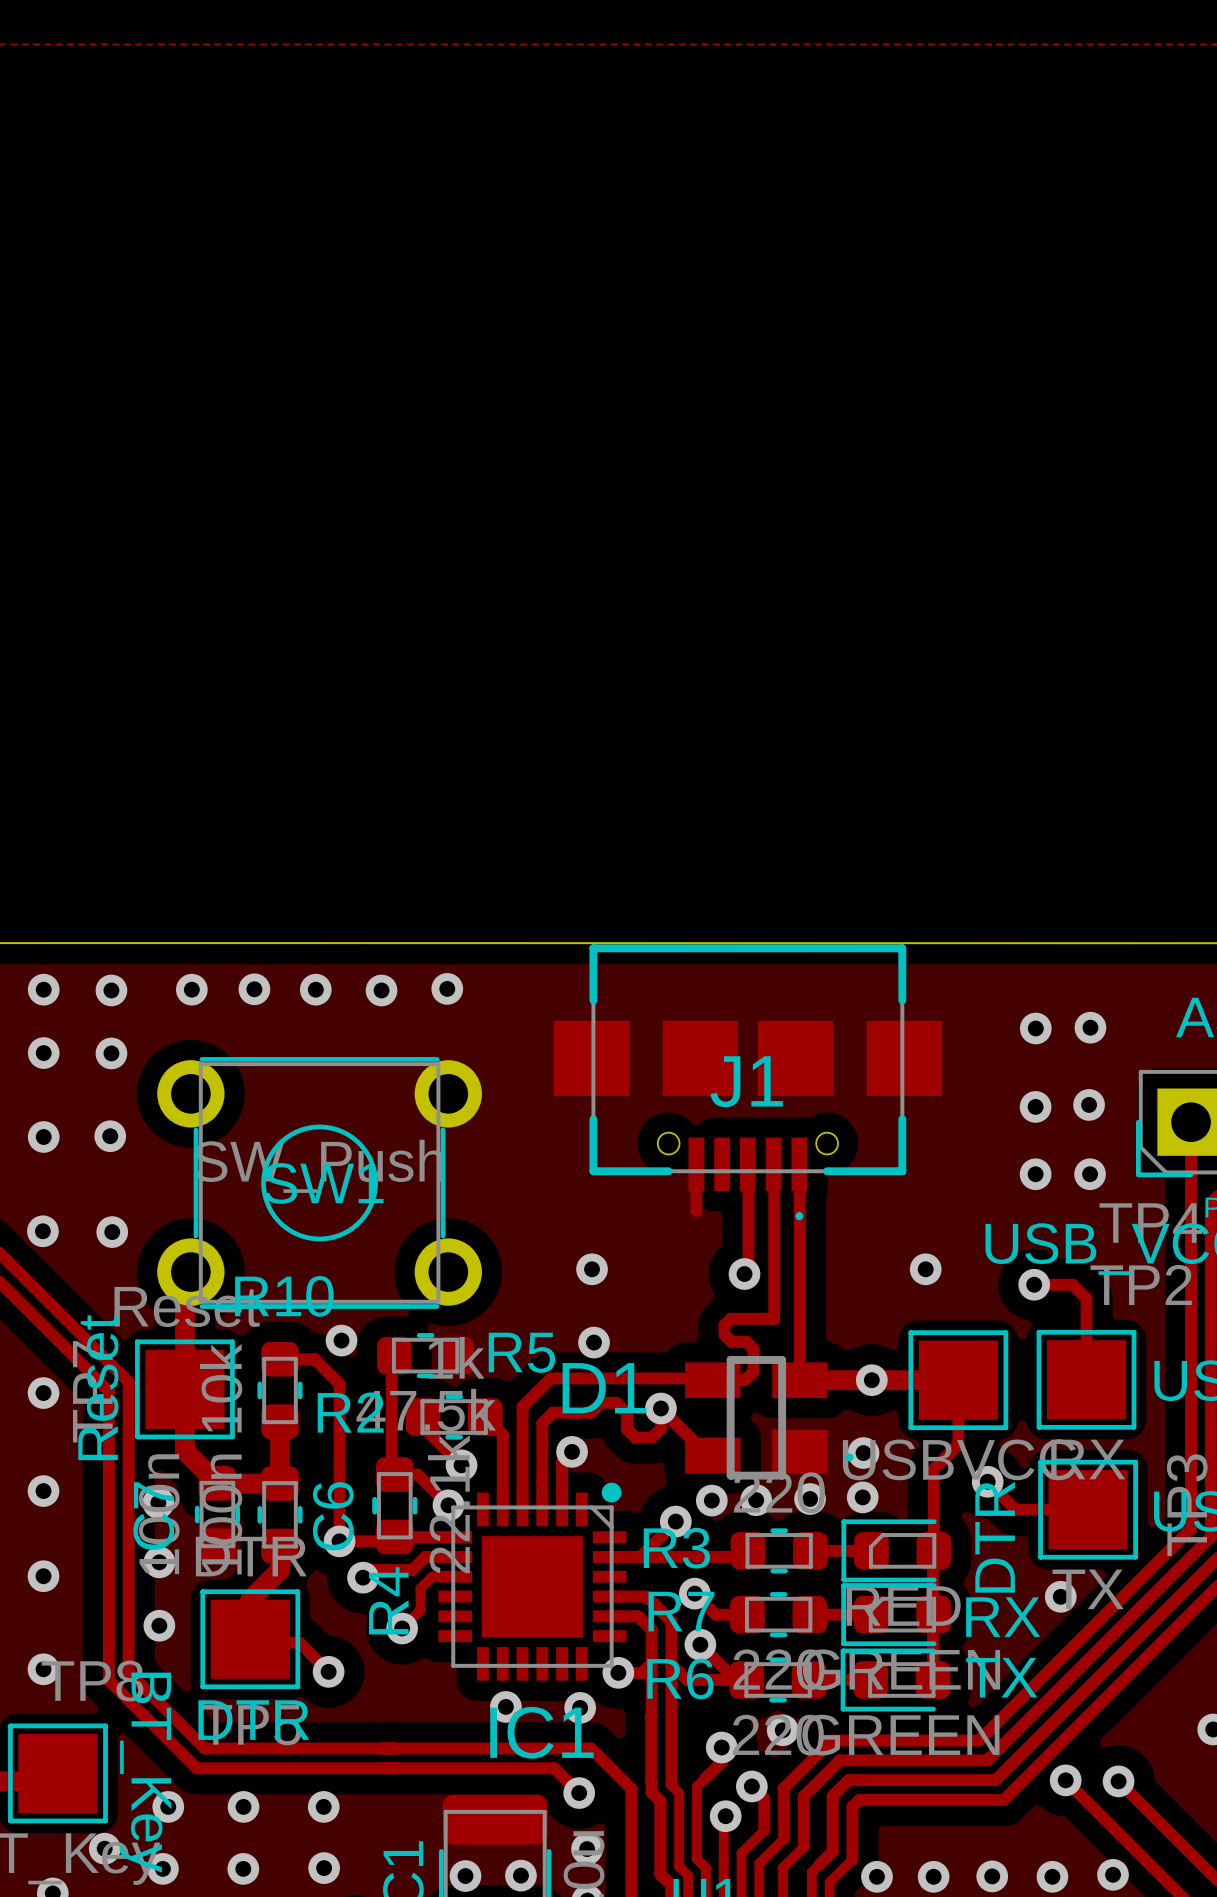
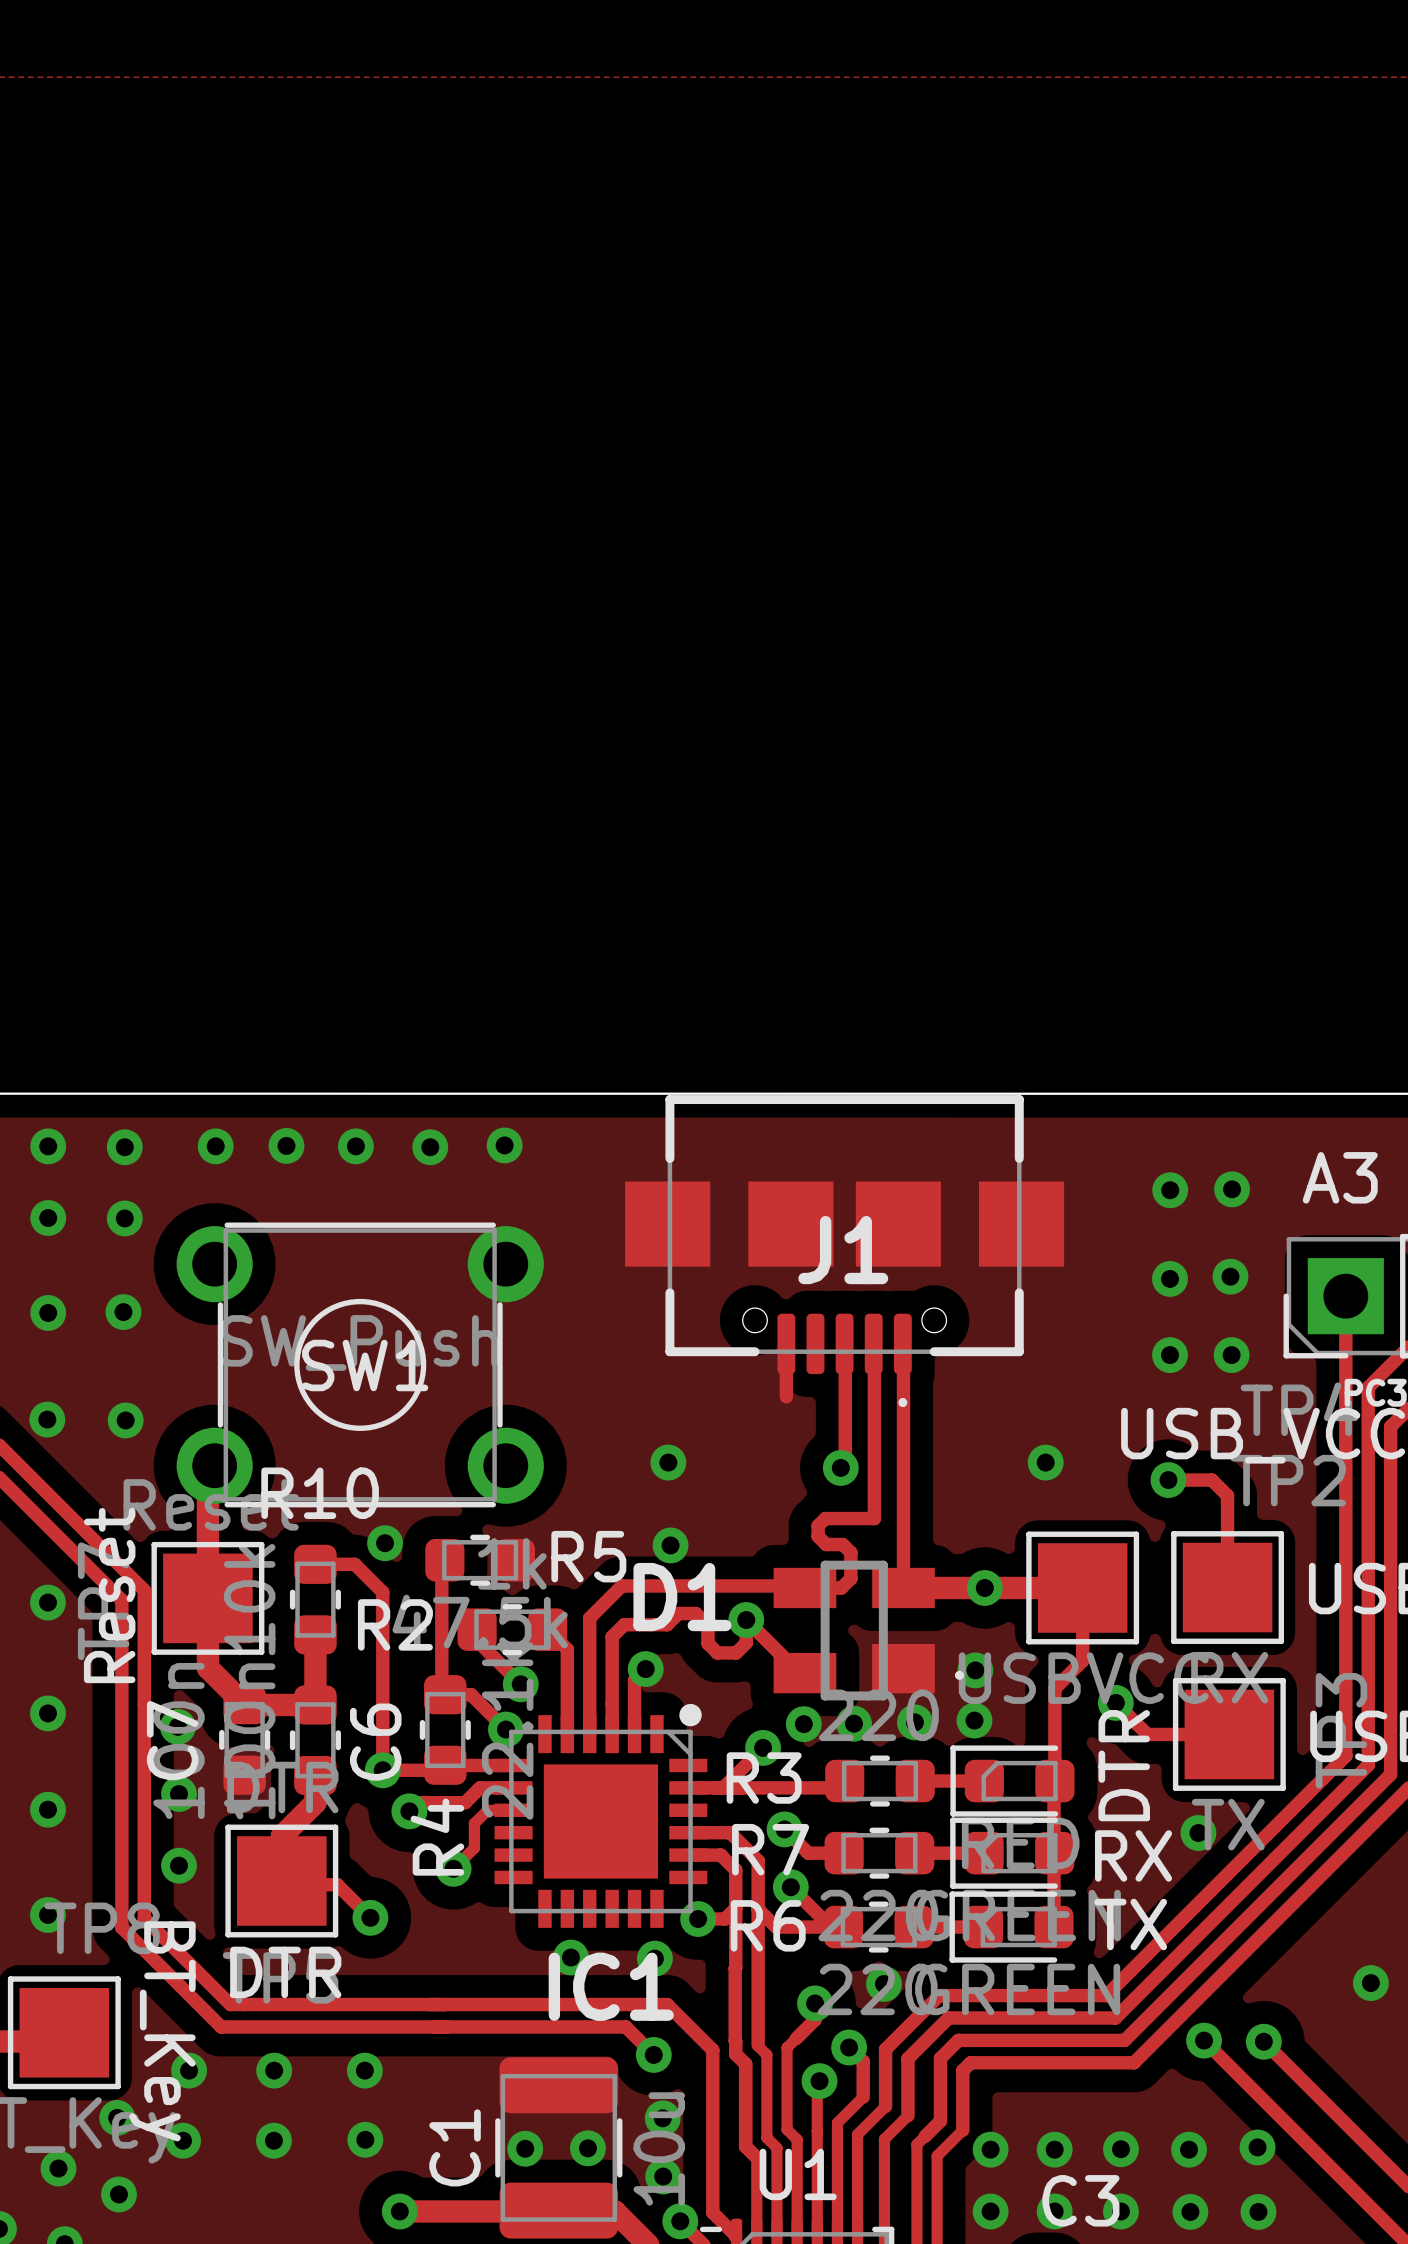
J1 footprint: [553, 944, 942, 1221] -> [625, 1095, 1065, 1408]

